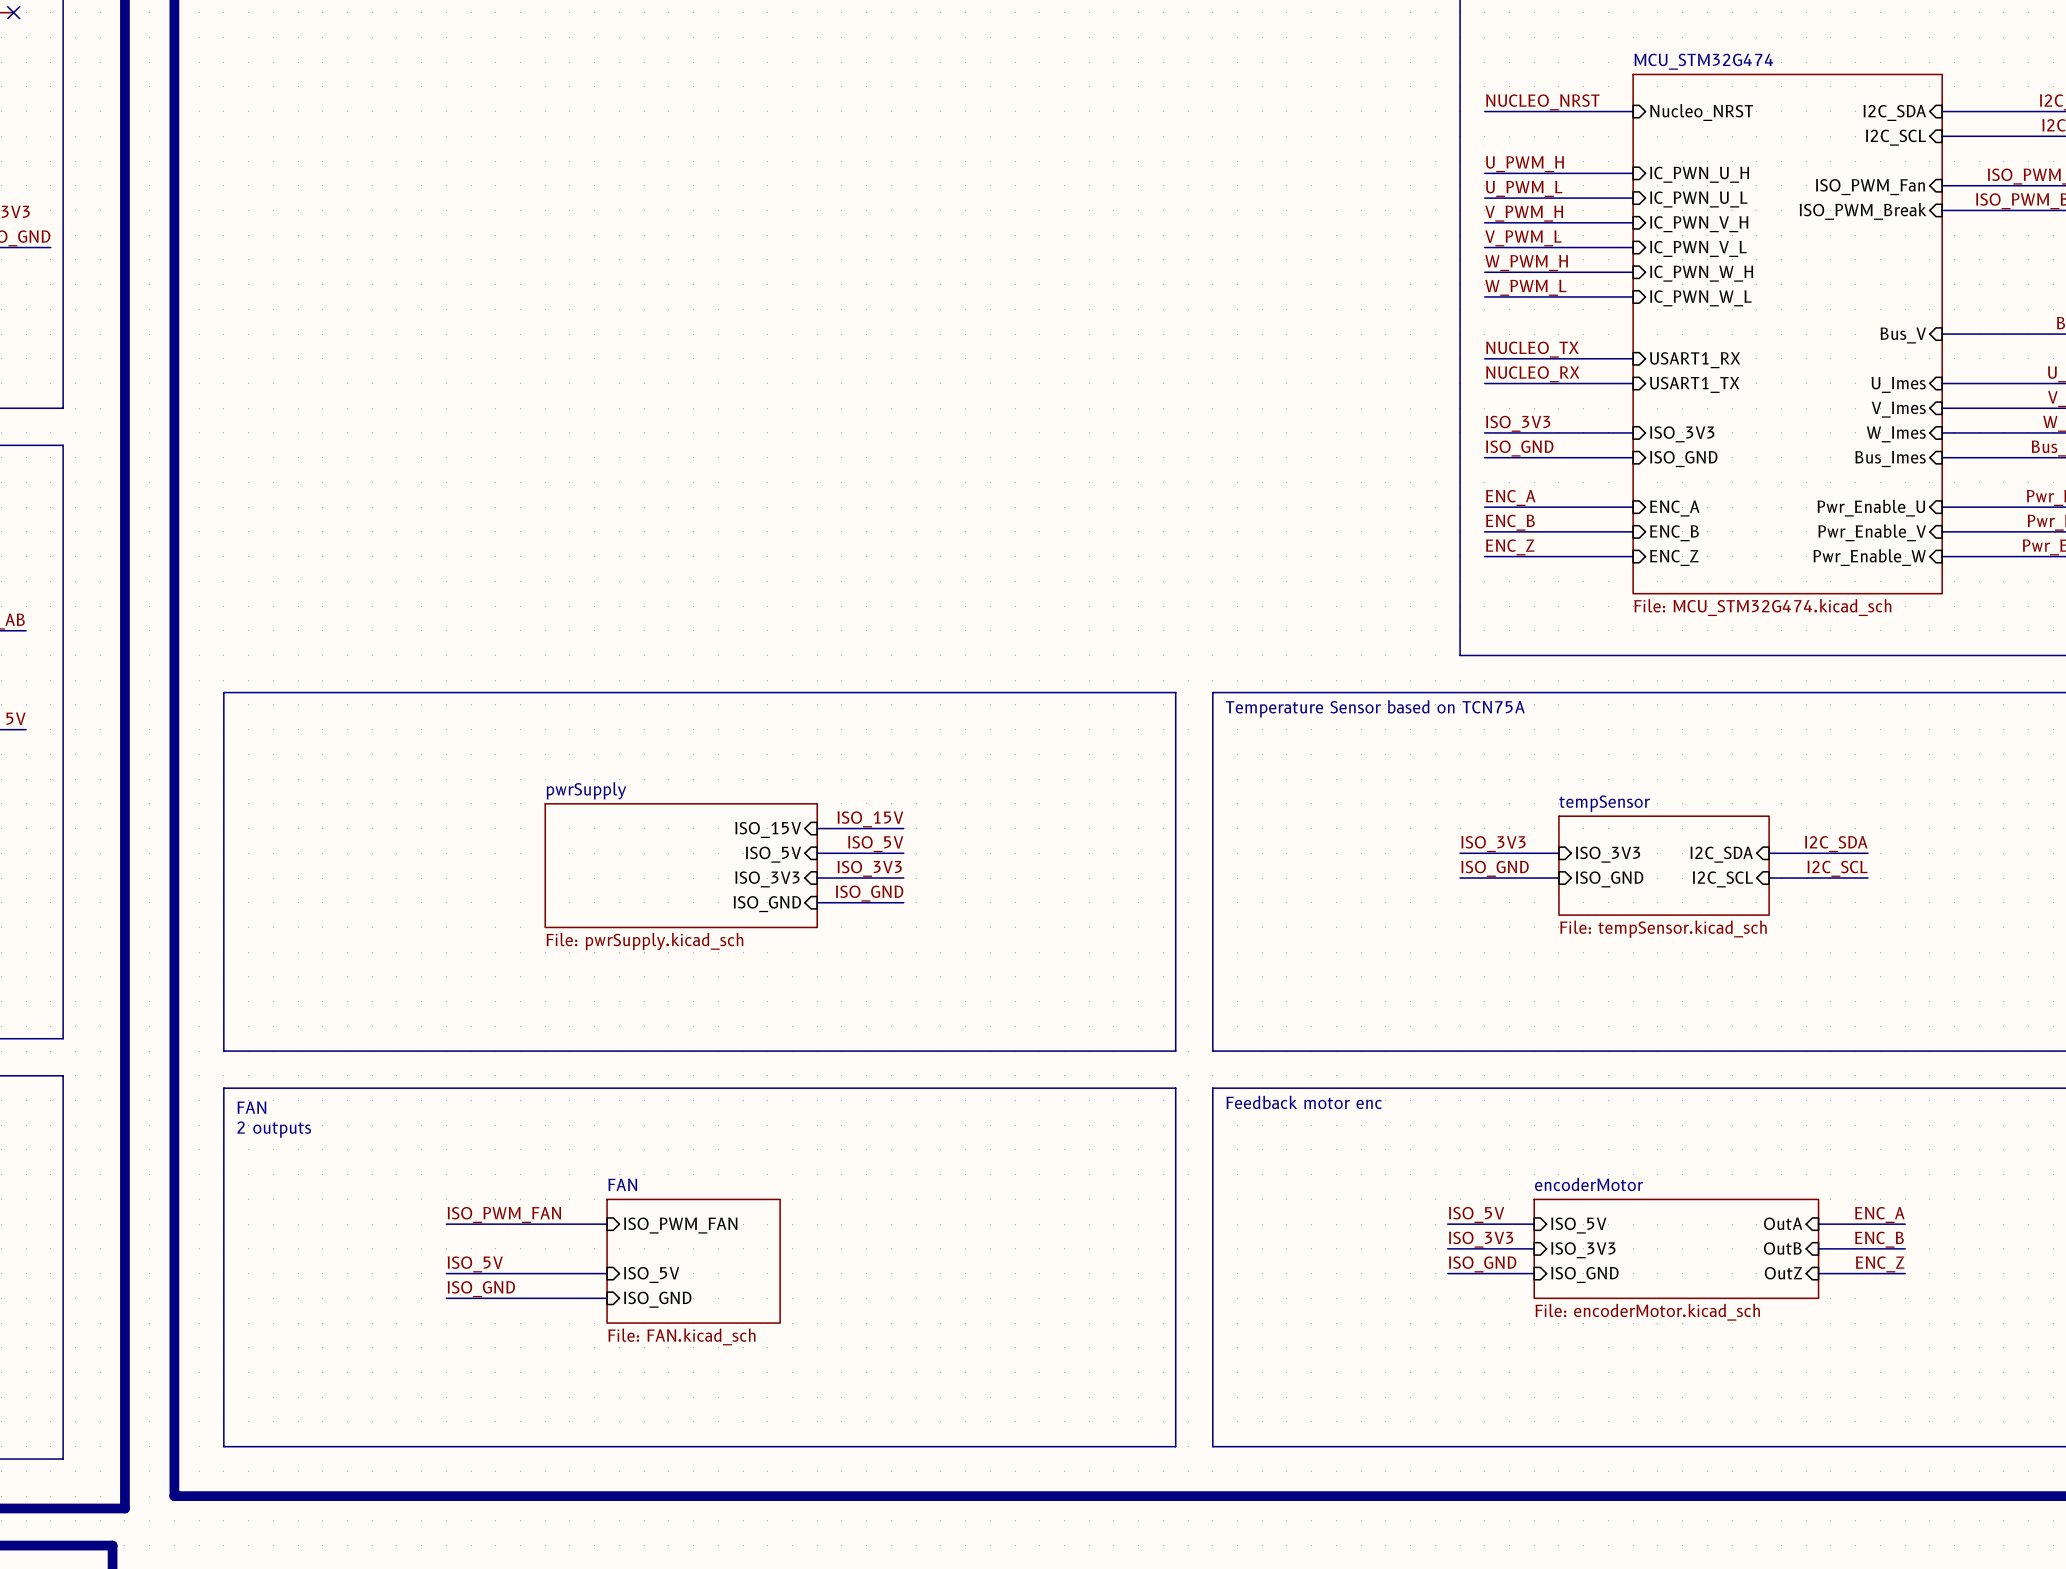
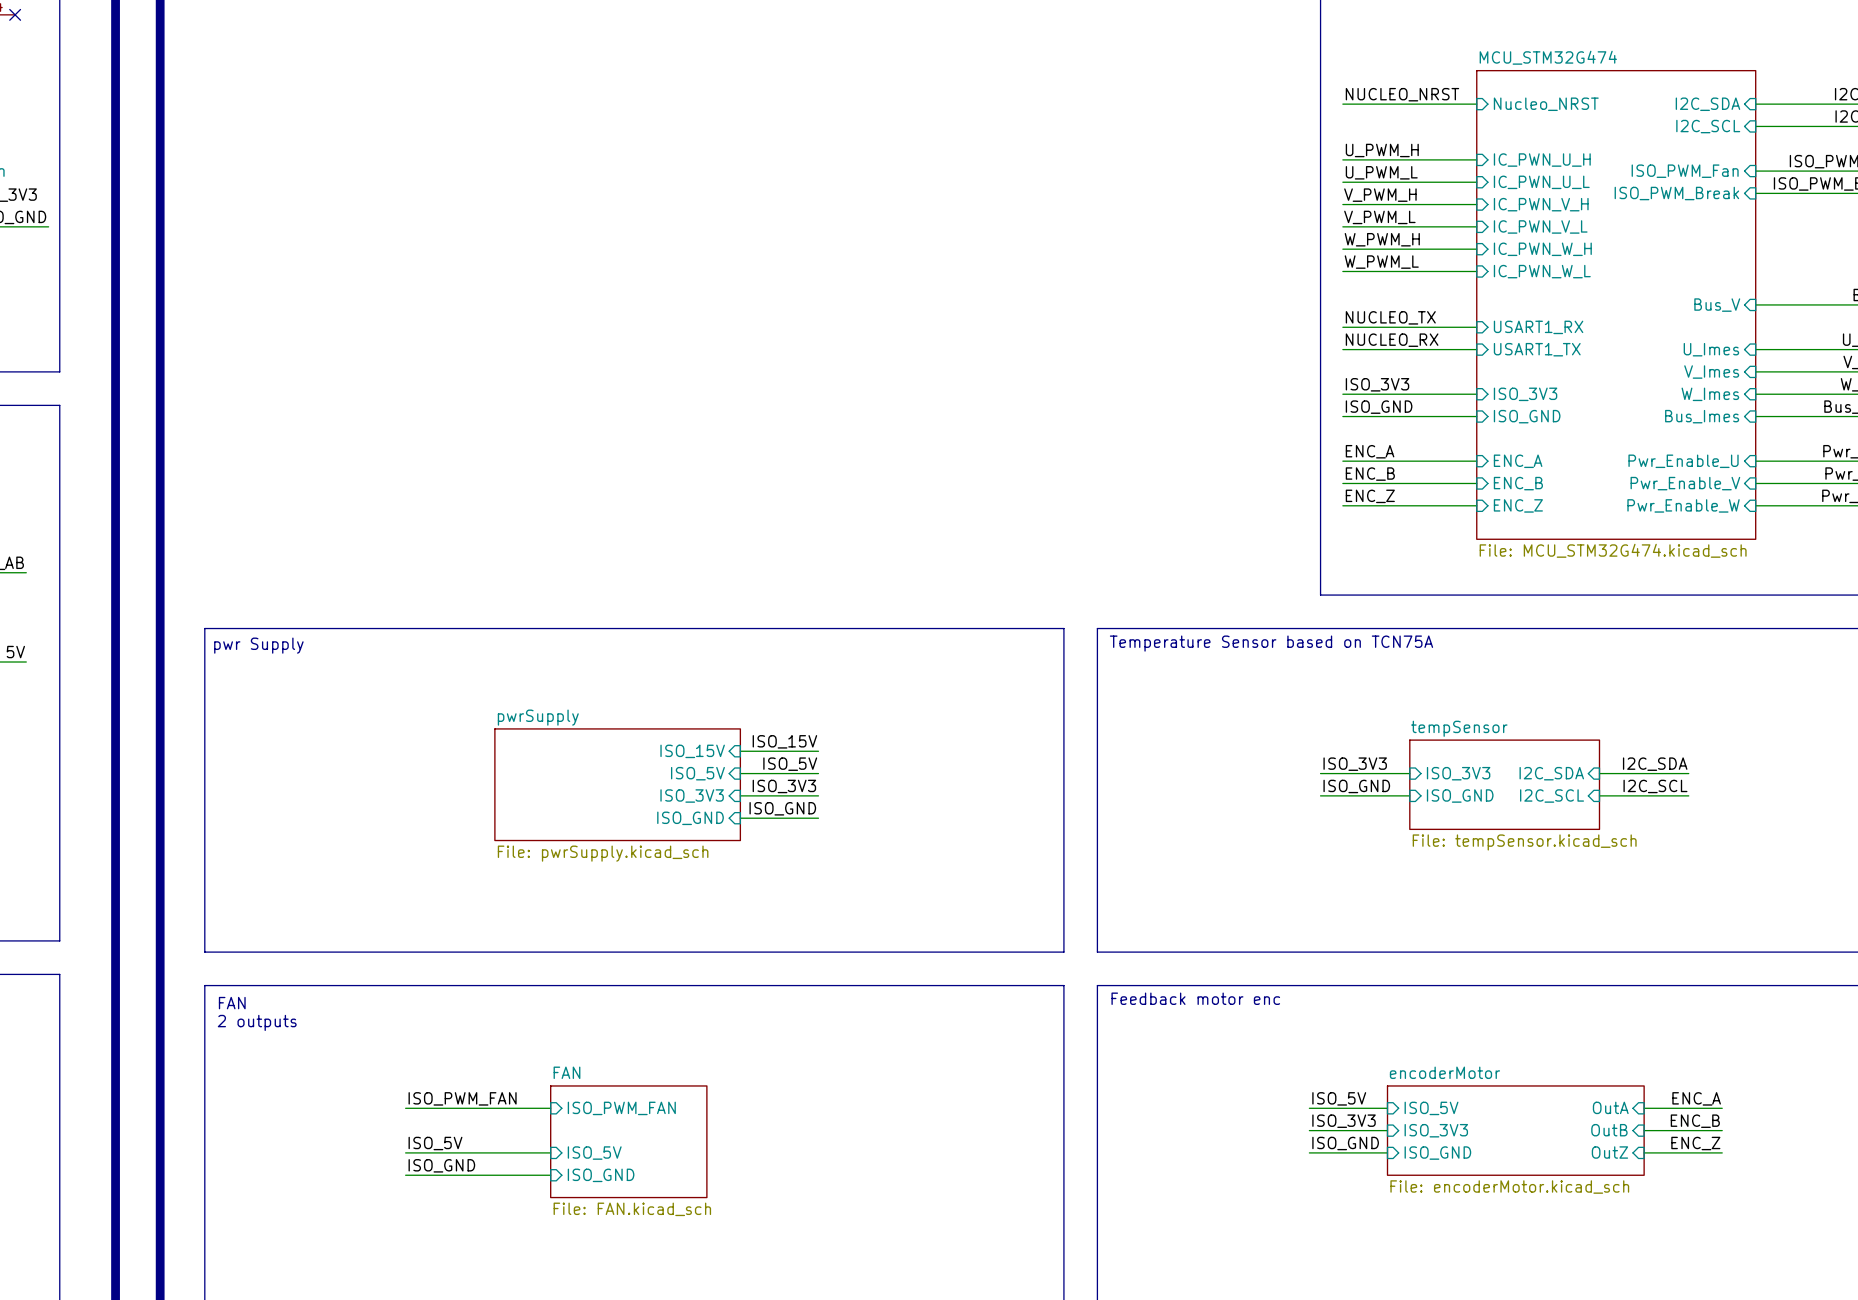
text: none -> pwr Supply (258, 645)

